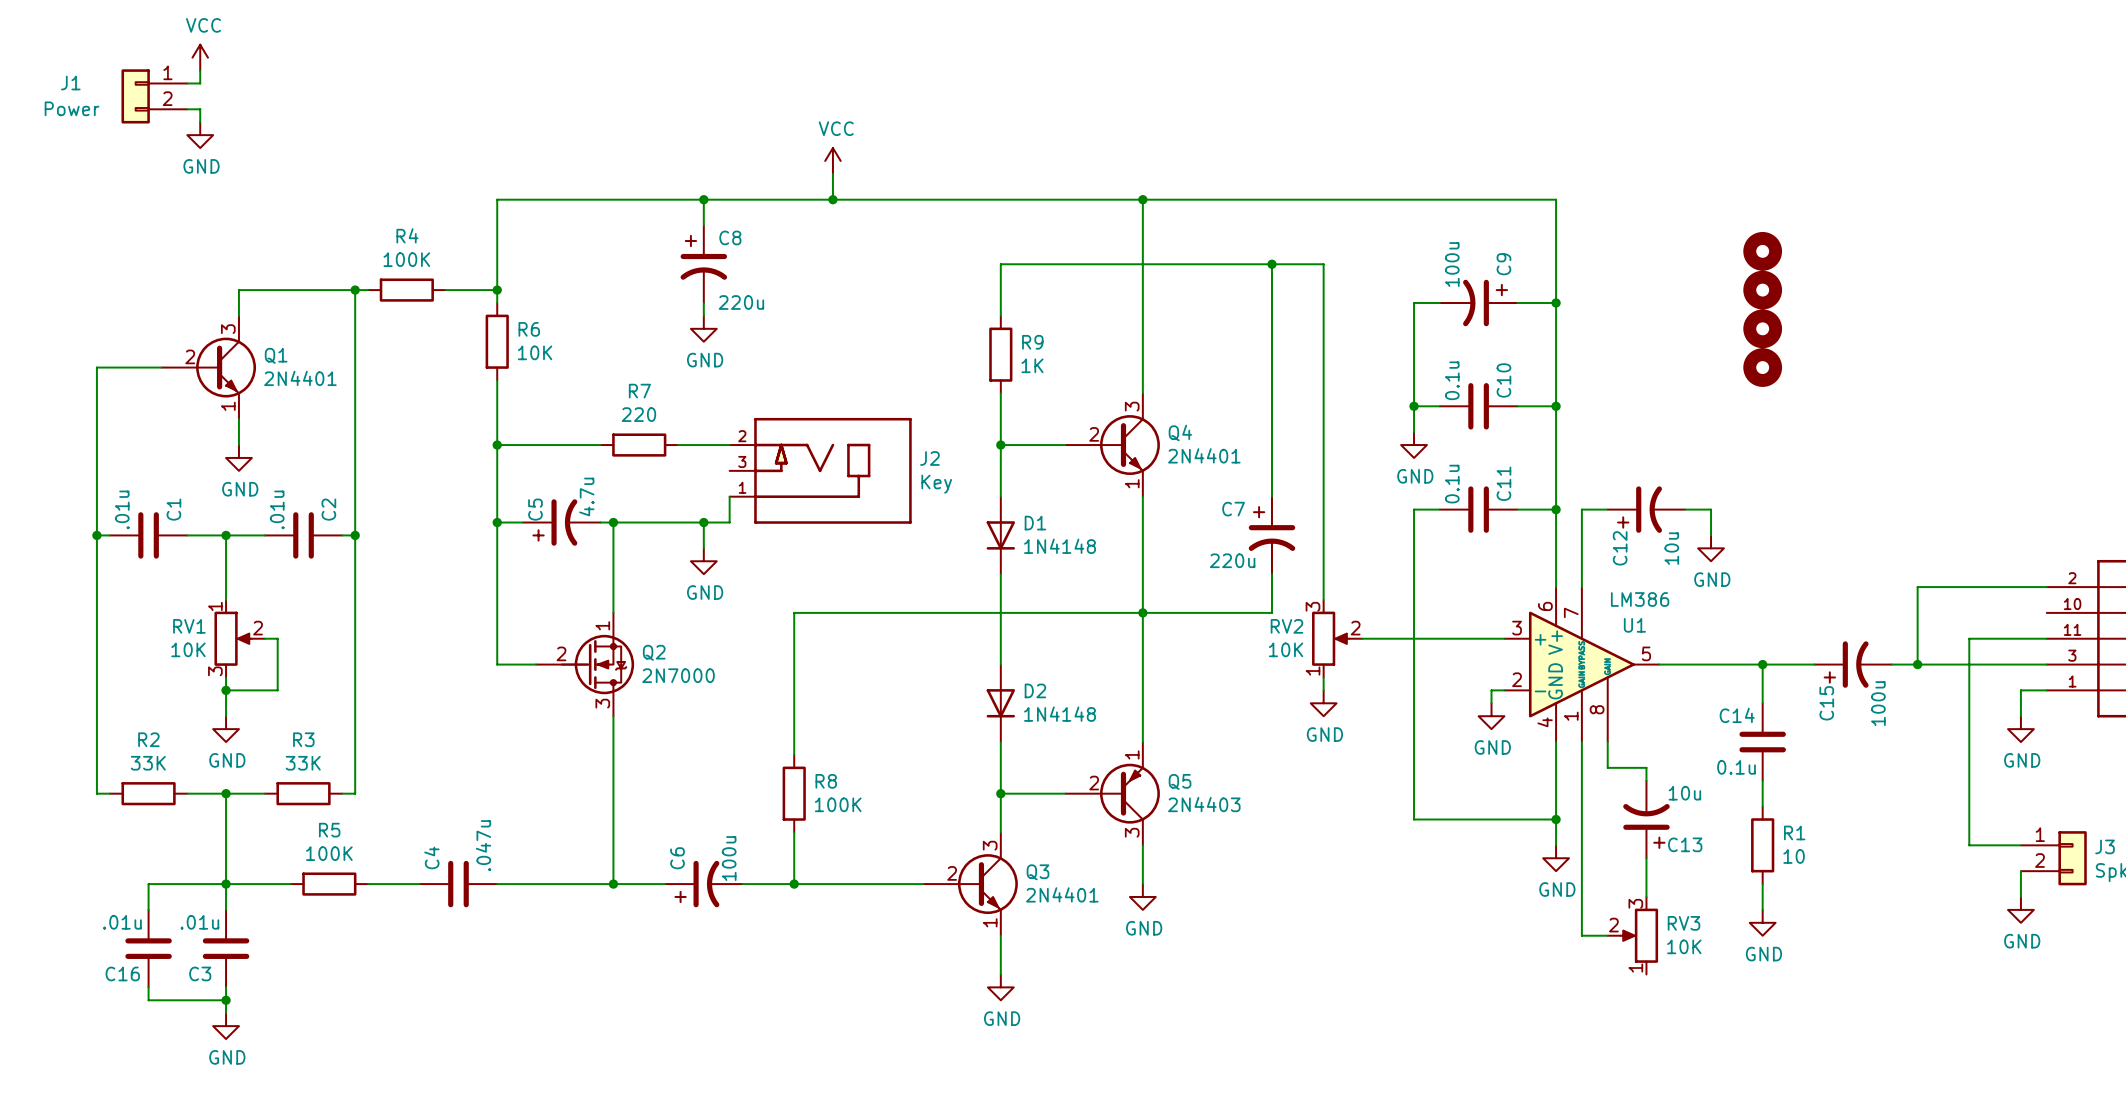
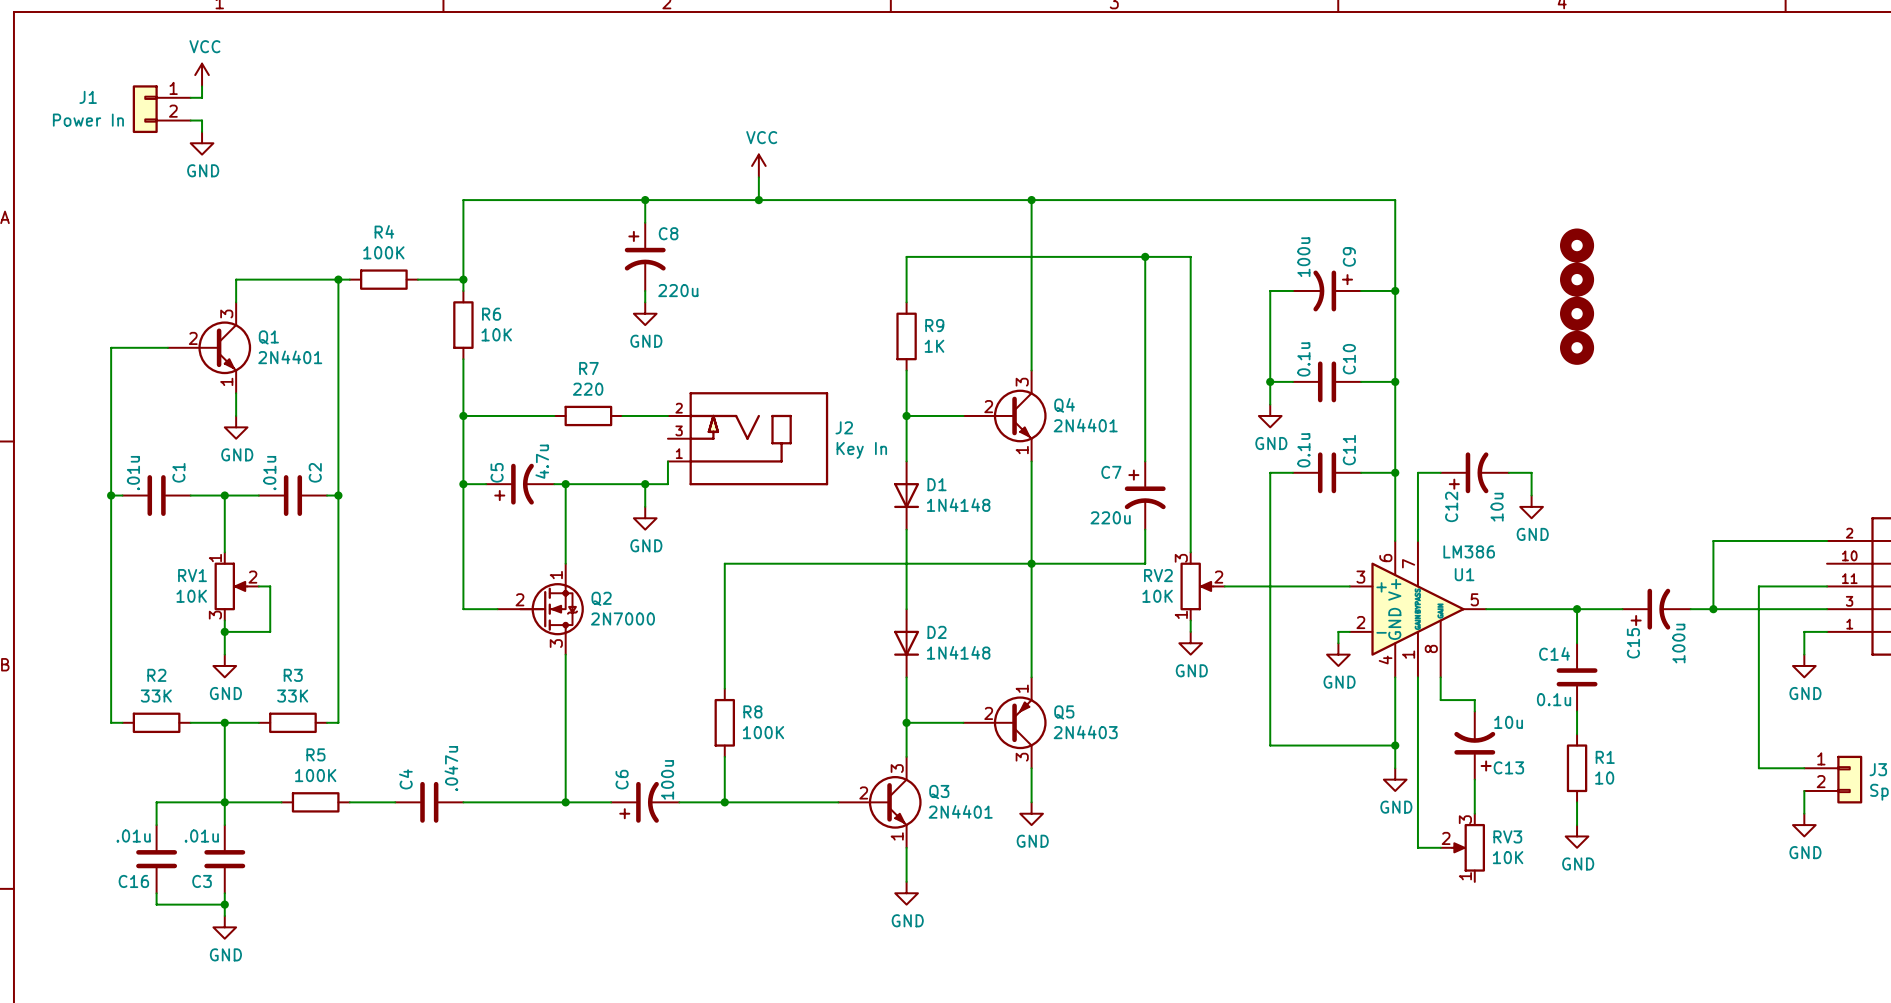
J1 value: Power (72, 108) -> Power In (88, 120)
J2 value: Key (936, 484) -> Key In (861, 450)

